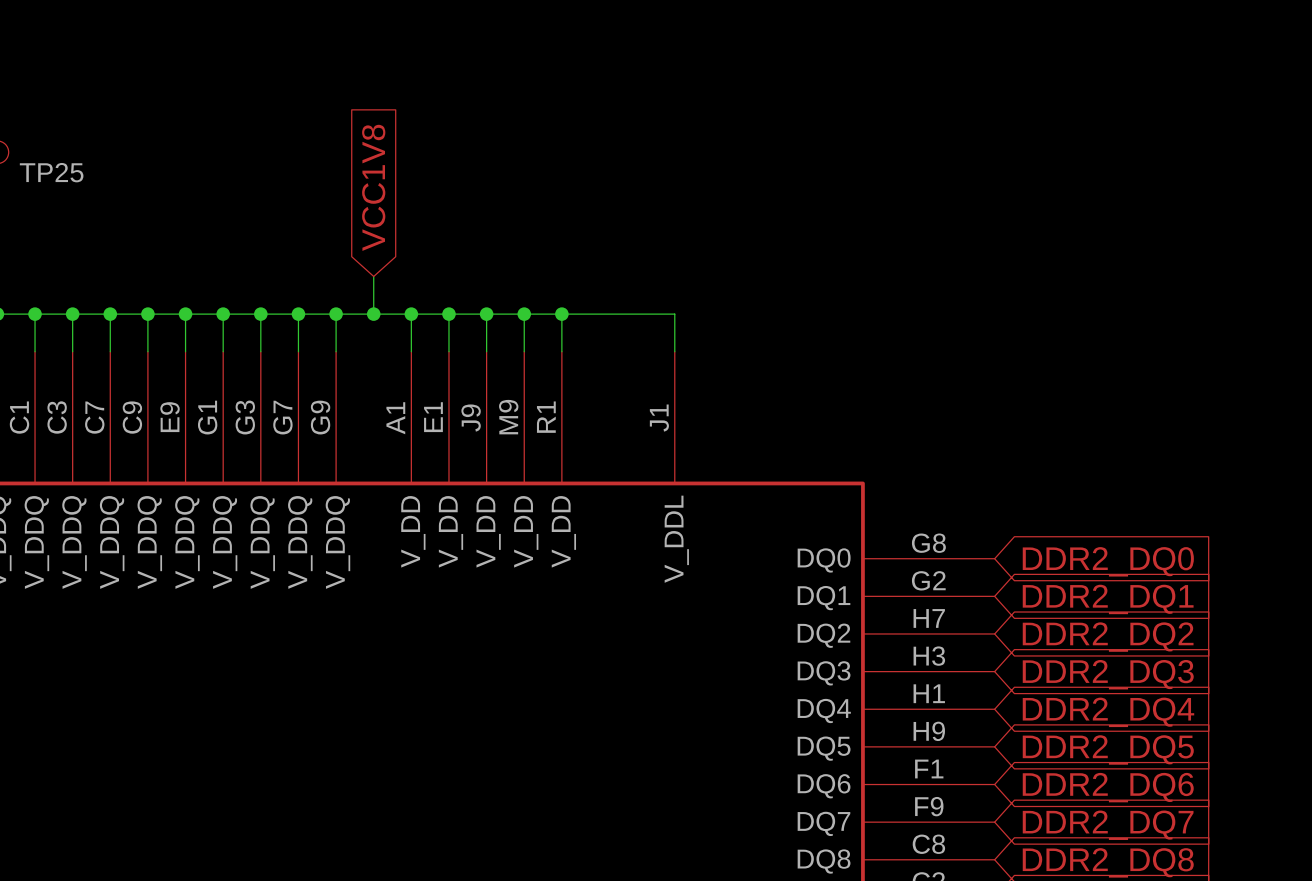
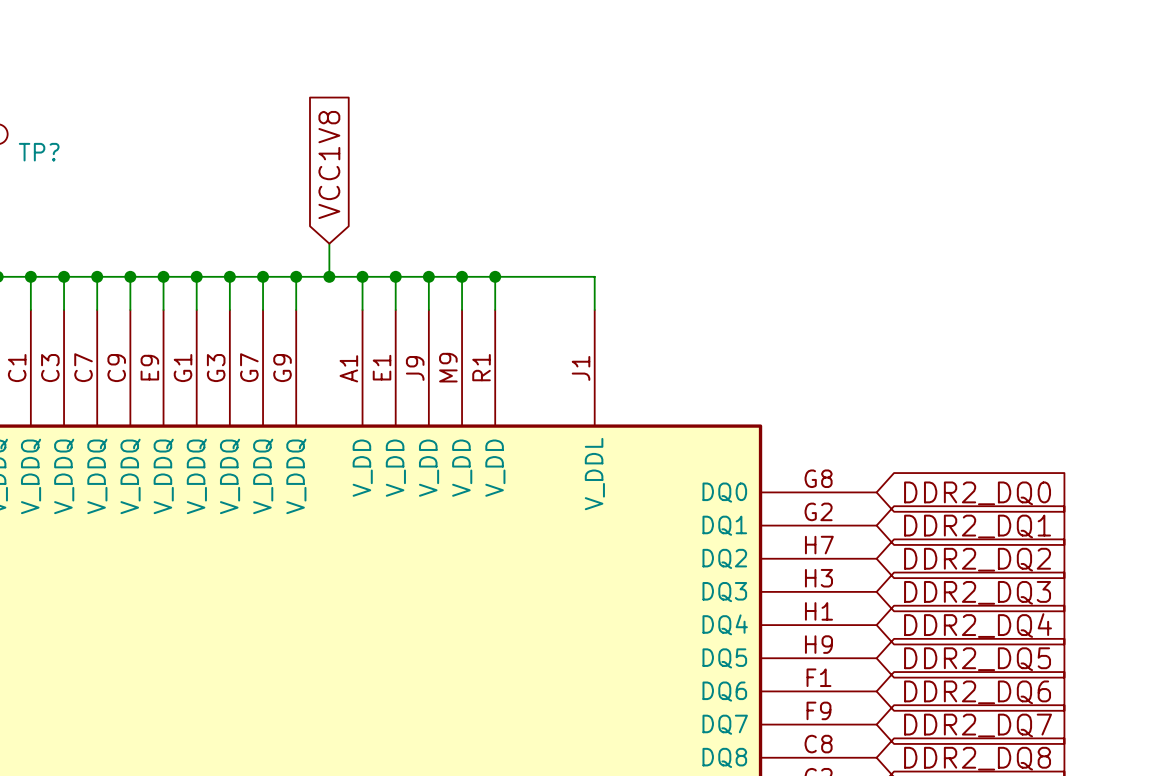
TP25 name: TP25 (51, 172) -> TP? (39, 152)

